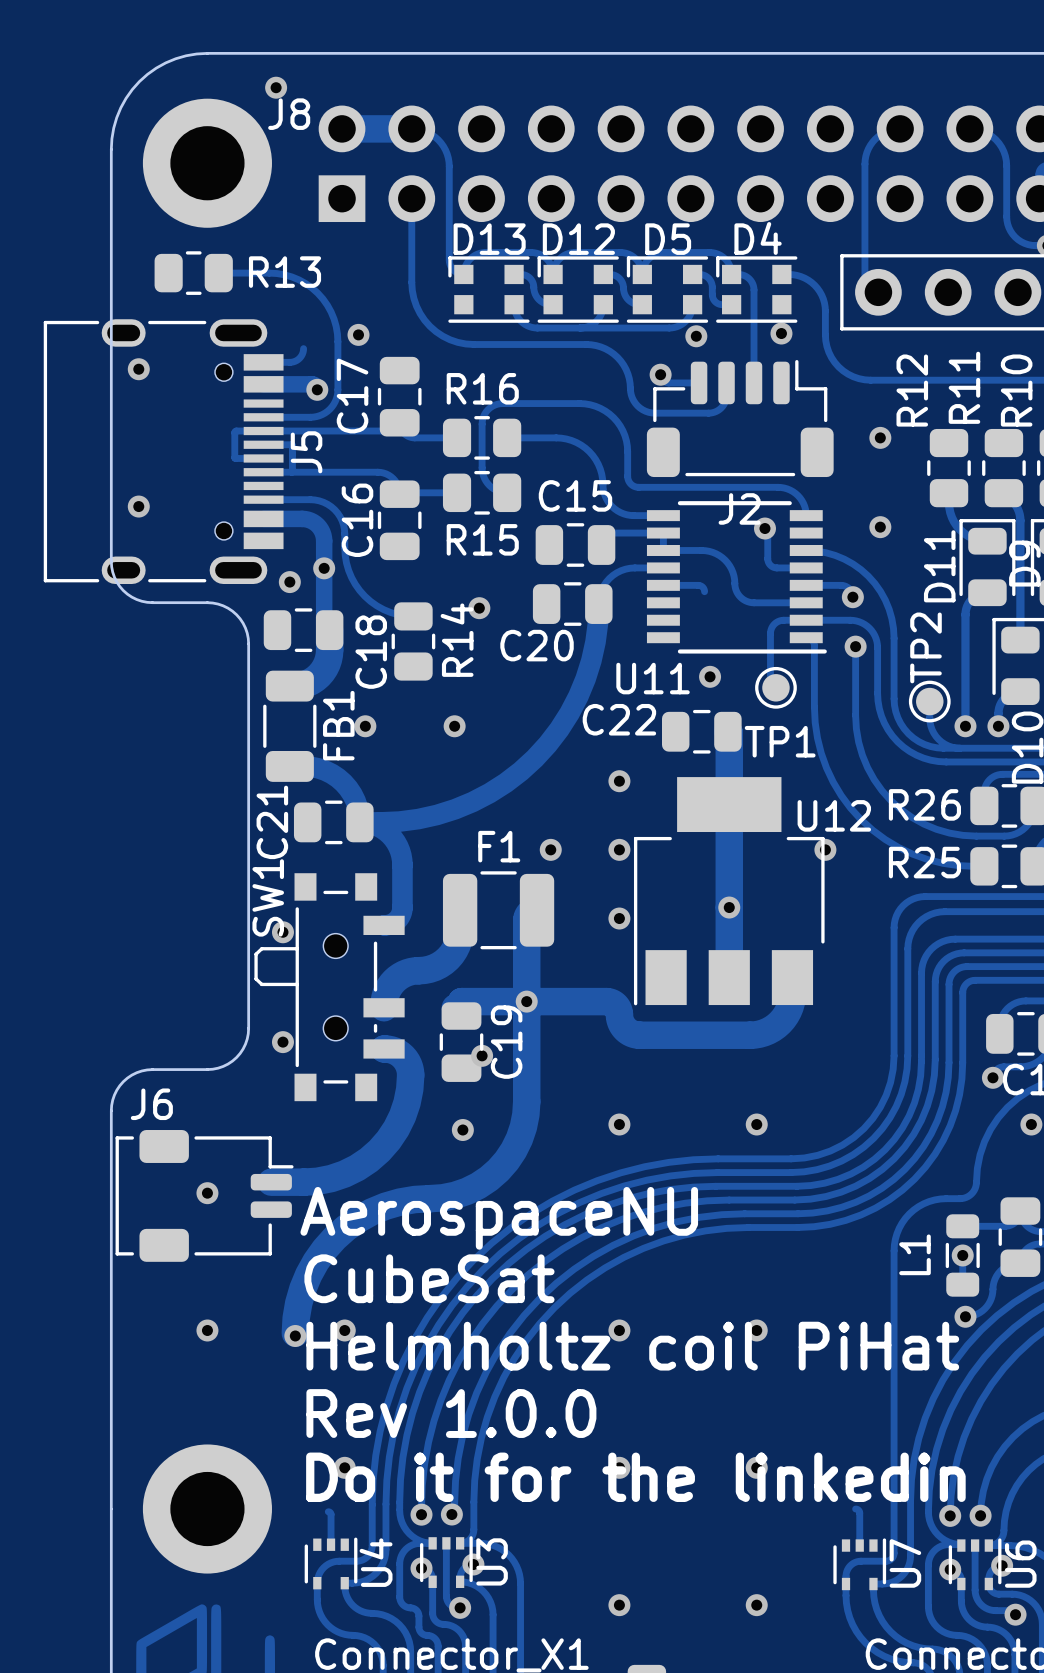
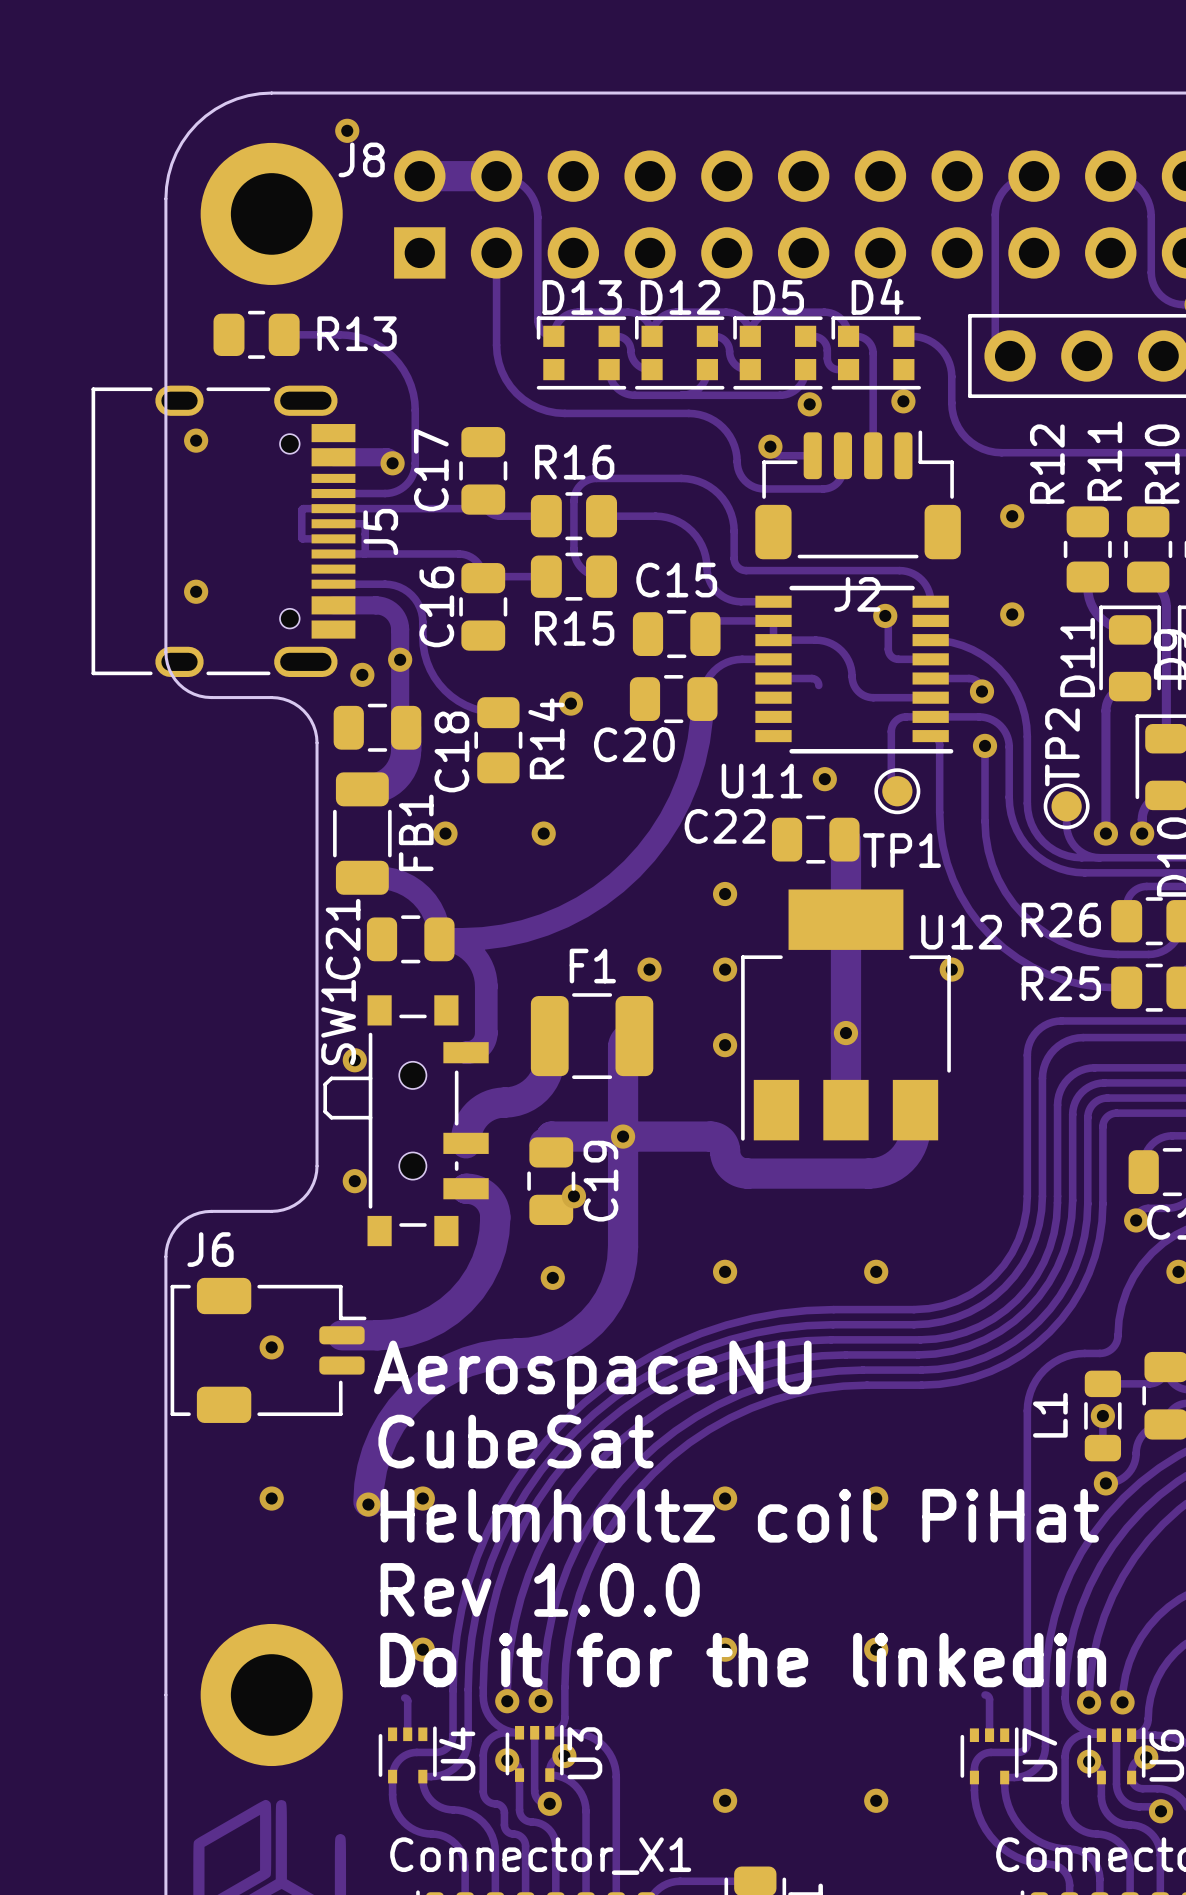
via: (358, 334) -> none
track: (303, 348) (301, 355) (295, 361) (263, 362) -> none

